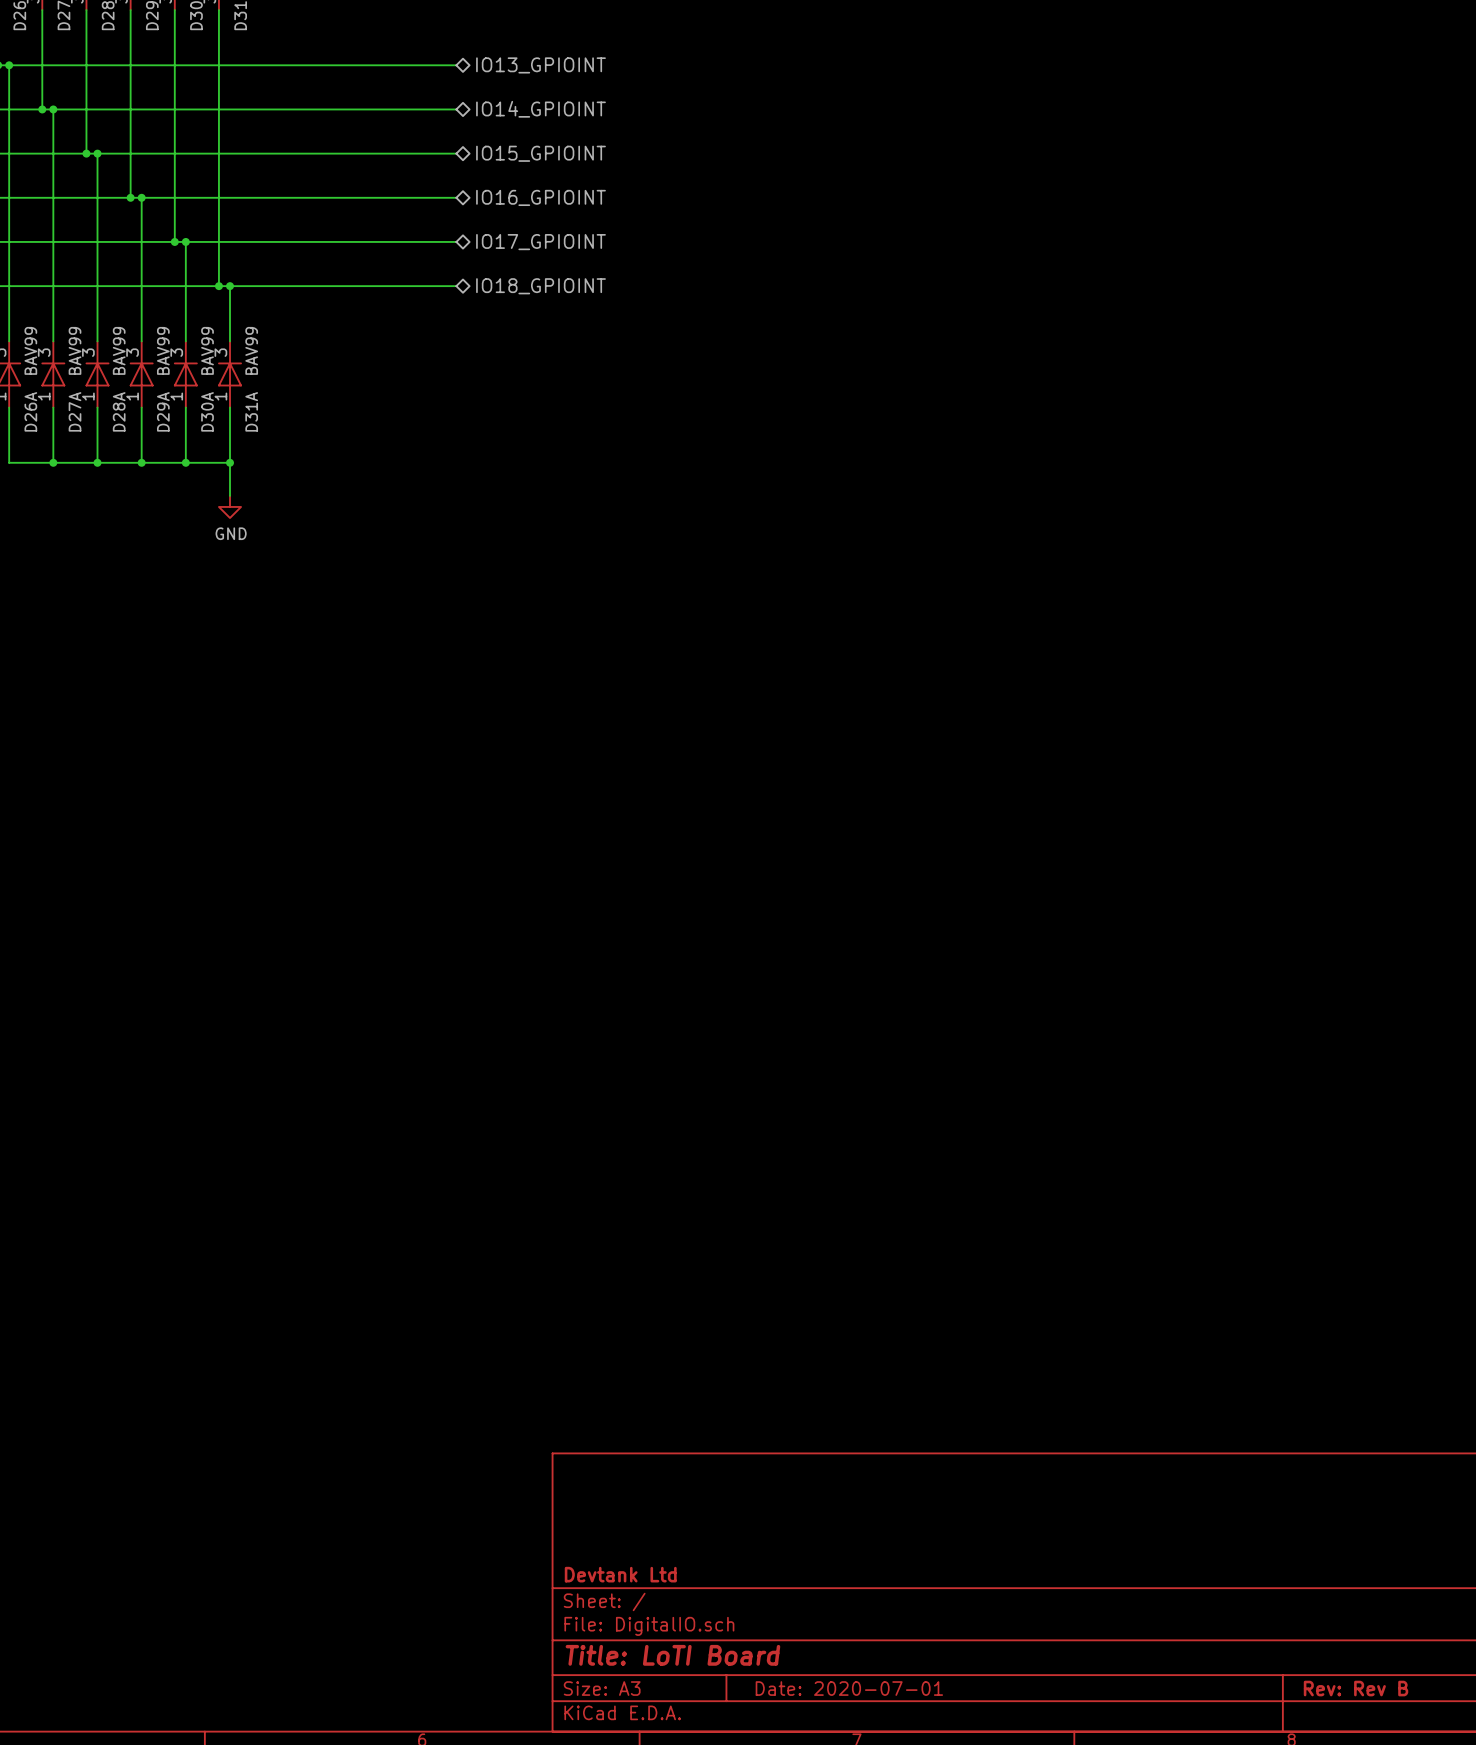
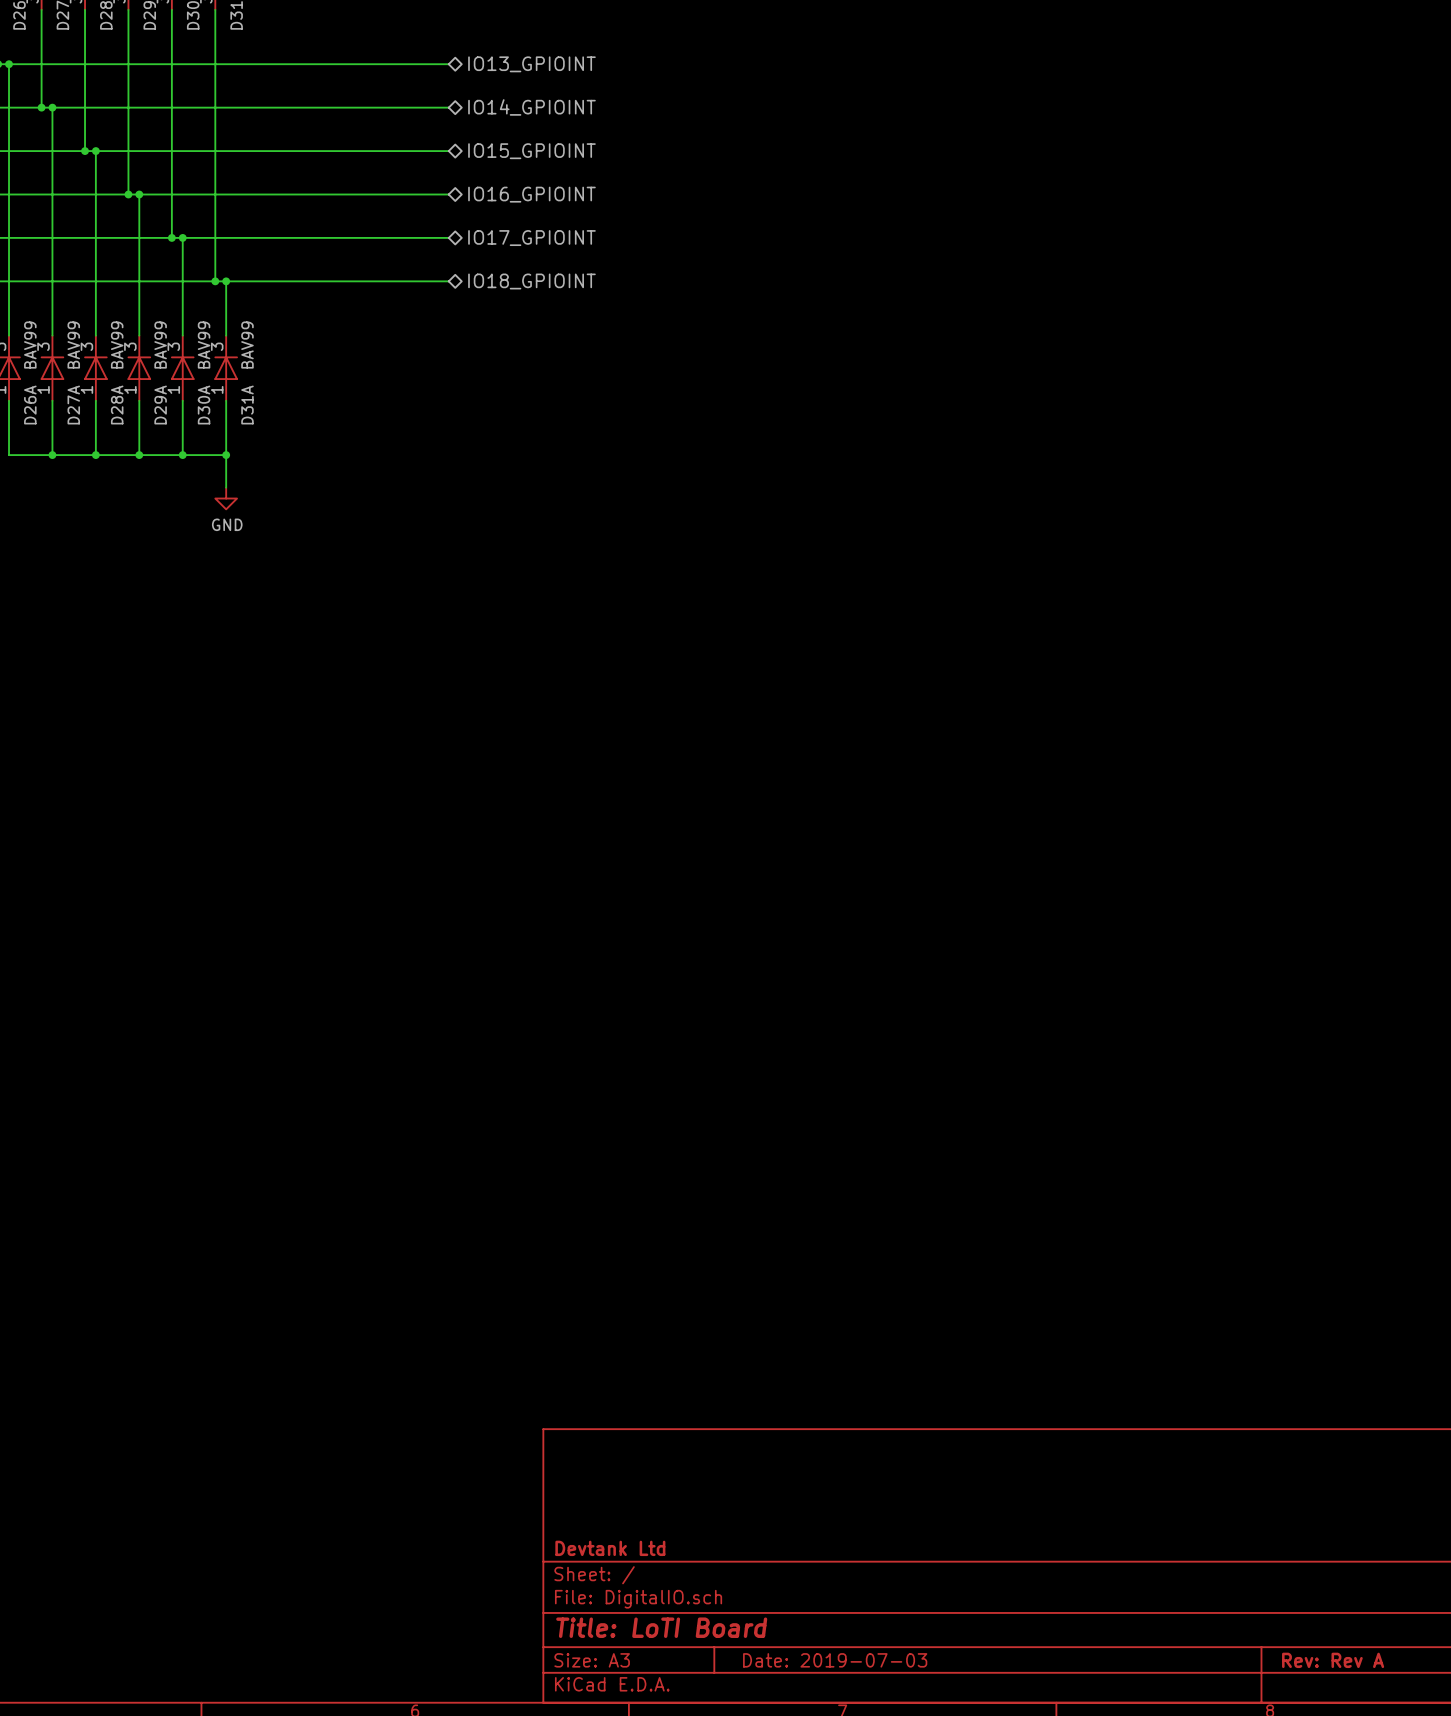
title block: Date: 2020-07-01 (849, 1688) -> Date: 2019-07-03 (835, 1660)
title block: Rev: Rev B (1356, 1688) -> Rev: Rev A (1333, 1660)

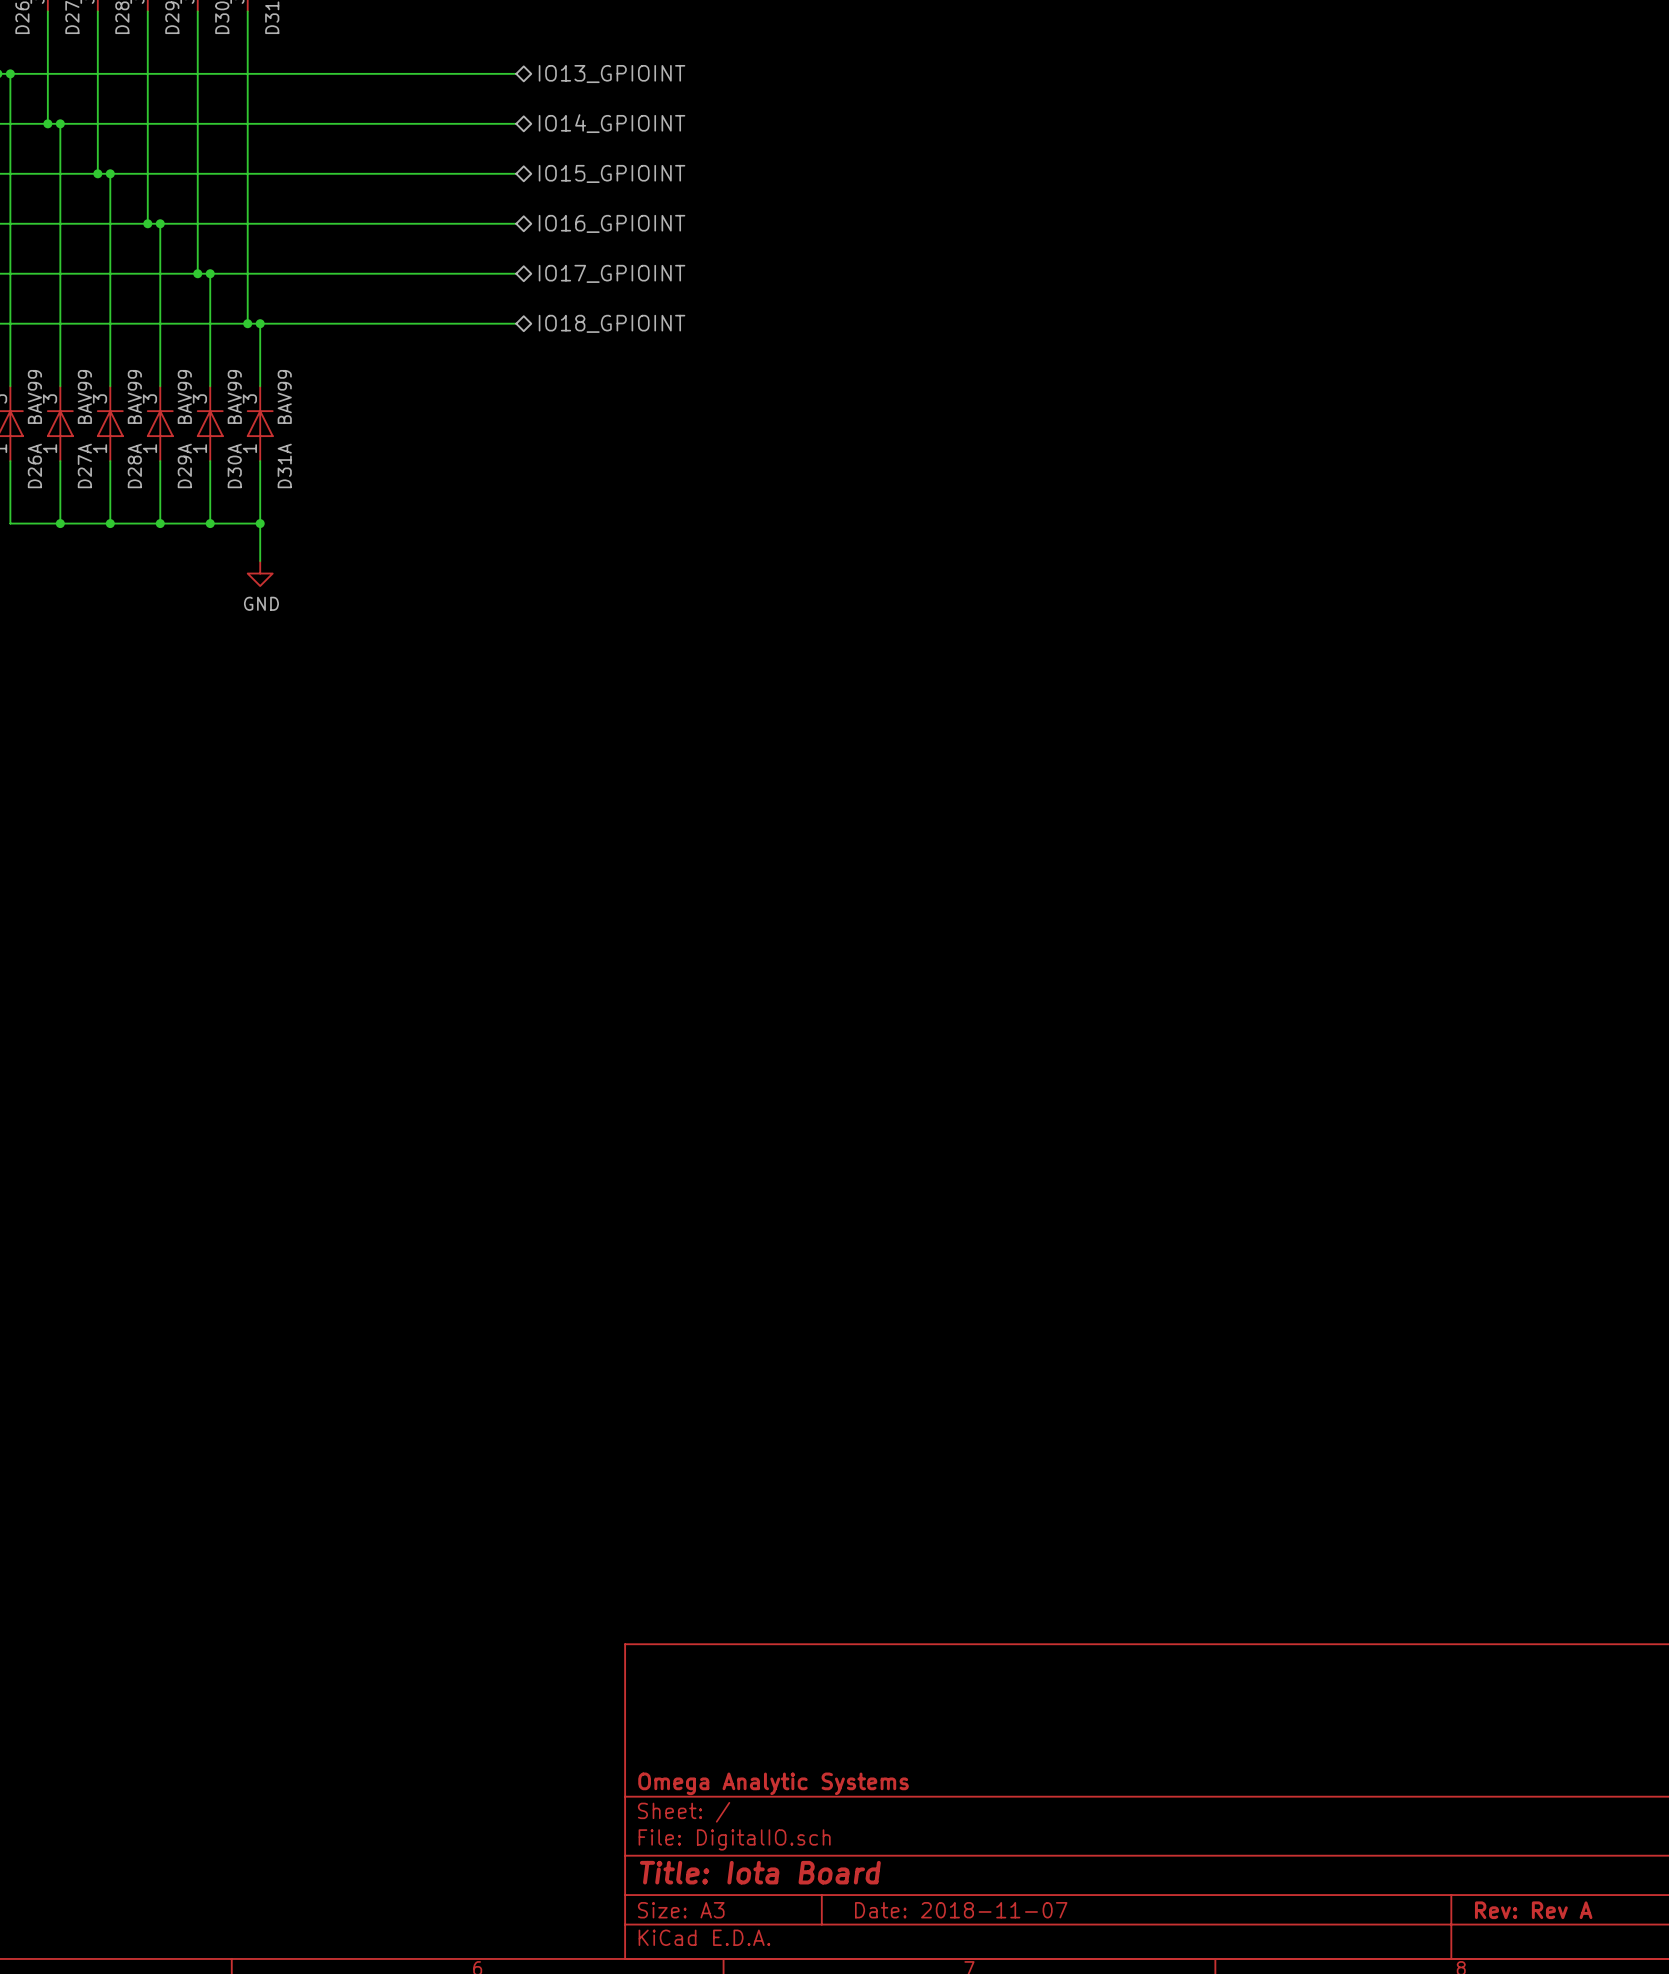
title block: Devtank Ltd (610, 1548) -> Omega Analytic Systems (773, 1783)
title block: Title: LoTI Board (661, 1627) -> Title: Iota Board (760, 1872)
title block: Date: 2019-07-03 (835, 1660) -> Date: 2018-11-07 (961, 1910)

